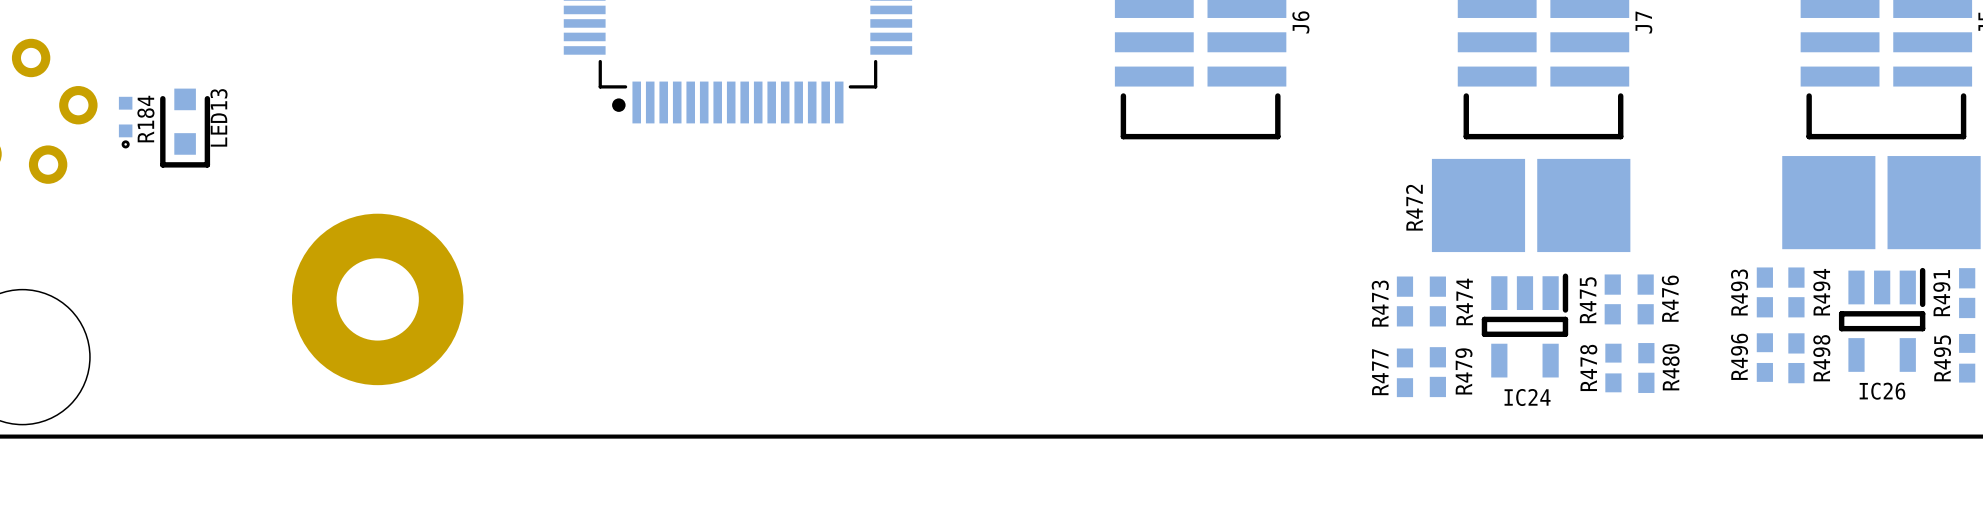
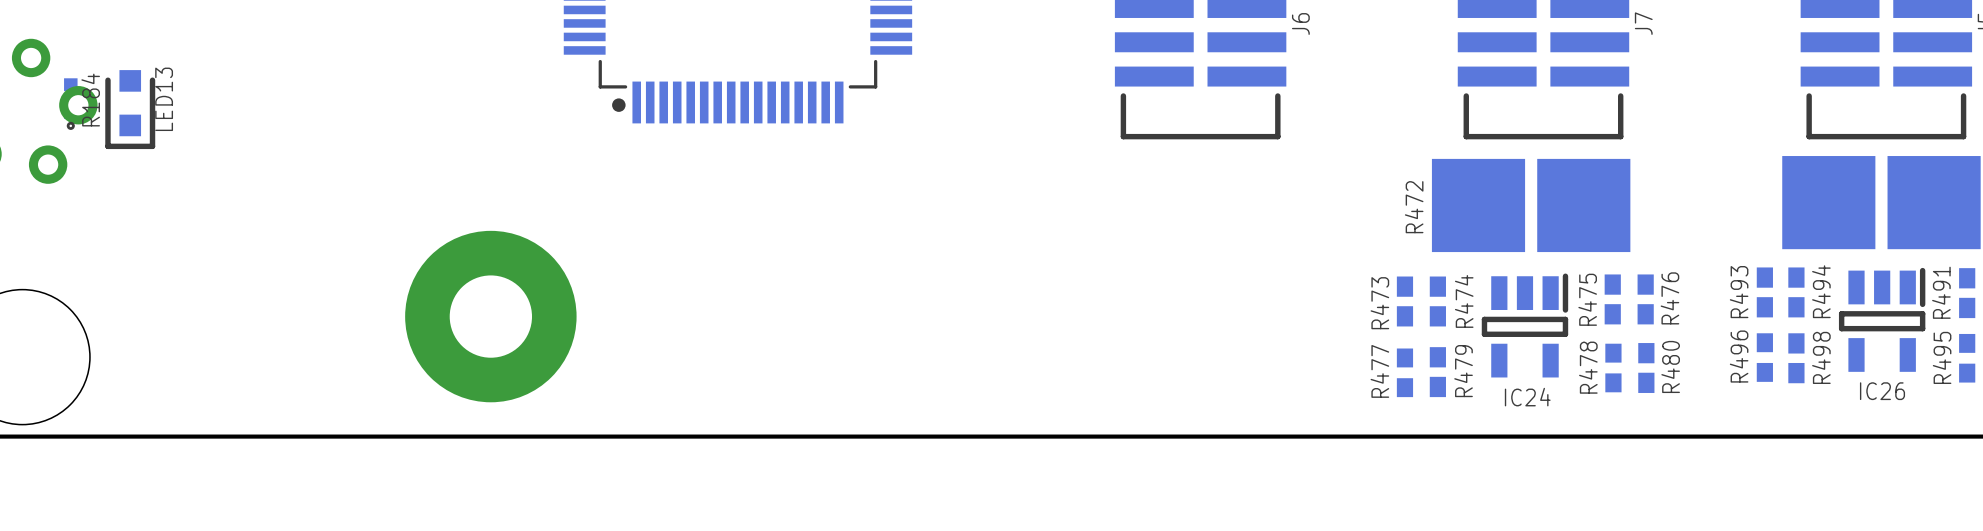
R184 position: (125, 122) -> (70, 104)
LED13 position: (185, 128) -> (130, 109)
part position: (377, 299) -> (490, 316)

